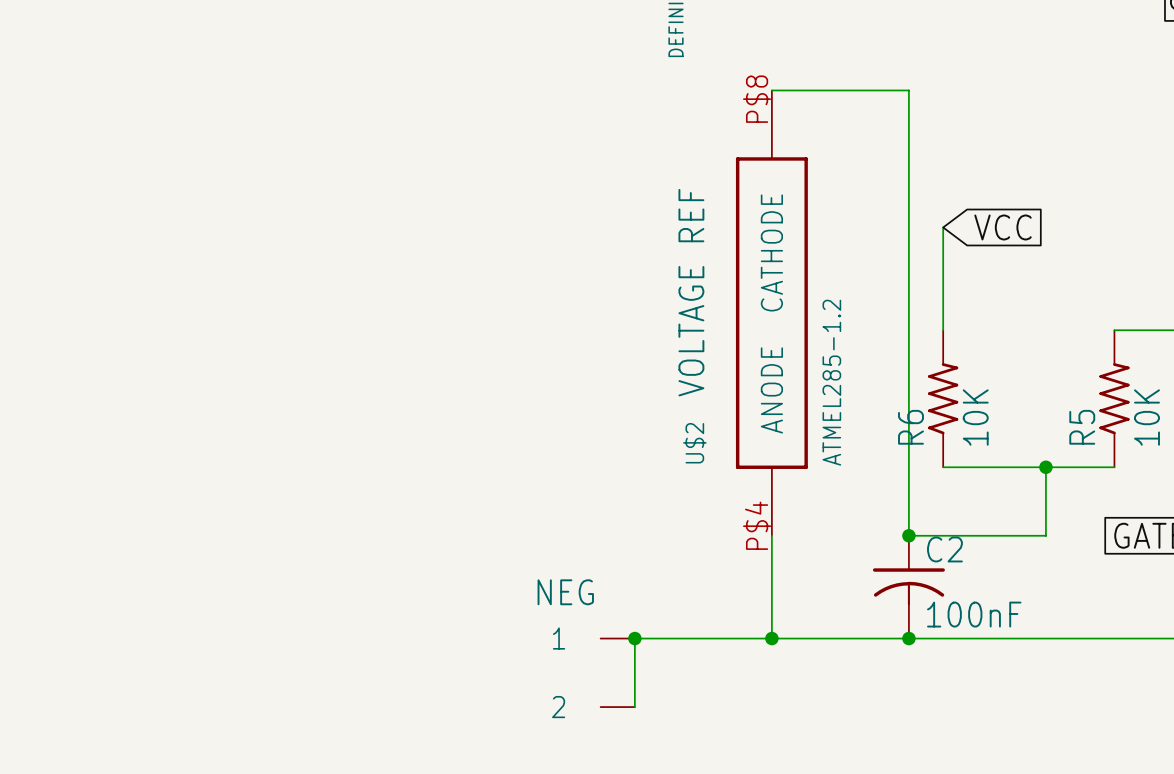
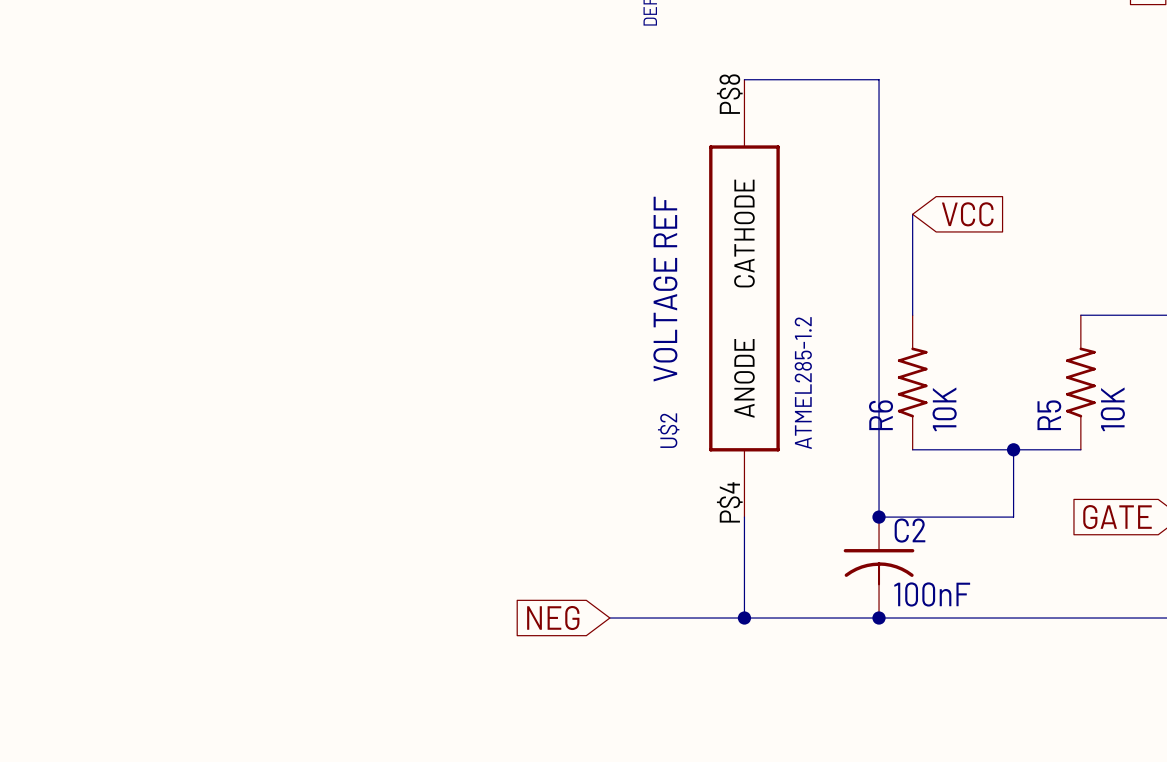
global label: none -> NEG (553, 618)
wire: (634, 638) (634, 707) -> none
junction: (634, 638) -> none
NEG: (617, 672) -> none

